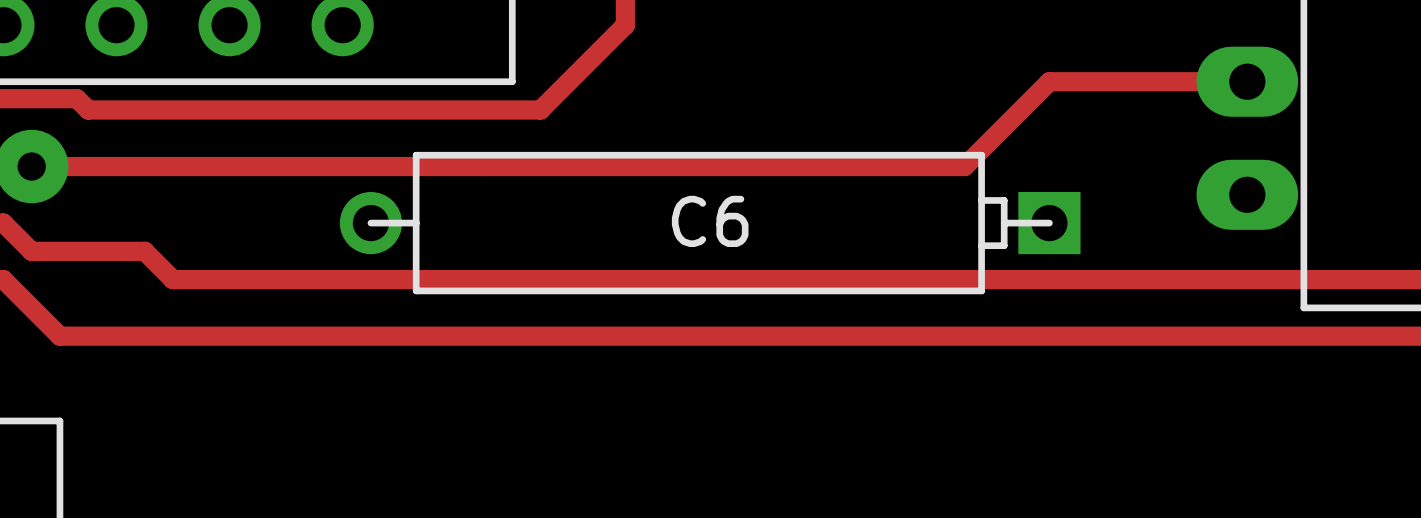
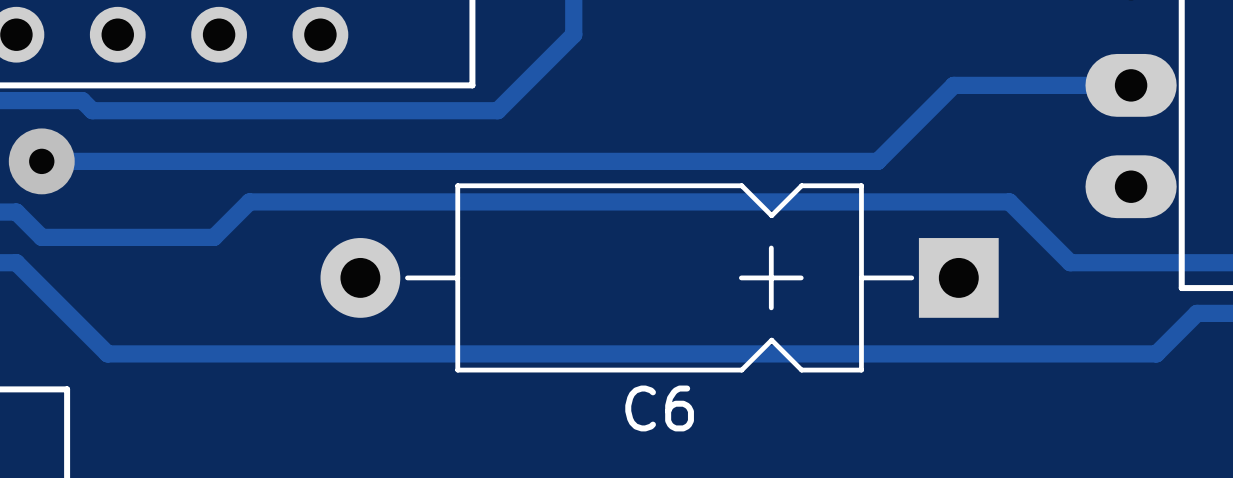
C6 footprint: [339, 151, 1081, 295] -> [320, 183, 999, 373]
C6 name position: C6 (710, 221) -> C6 (659, 408)
track: (144, 251) (173, 279) (1179, 279) -> (143, 237) (214, 237) (249, 201) (1009, 201) (1070, 262)
track: (59, 336) (1320, 336) -> (67, 313) (107, 353) (1156, 353) (1196, 313)

